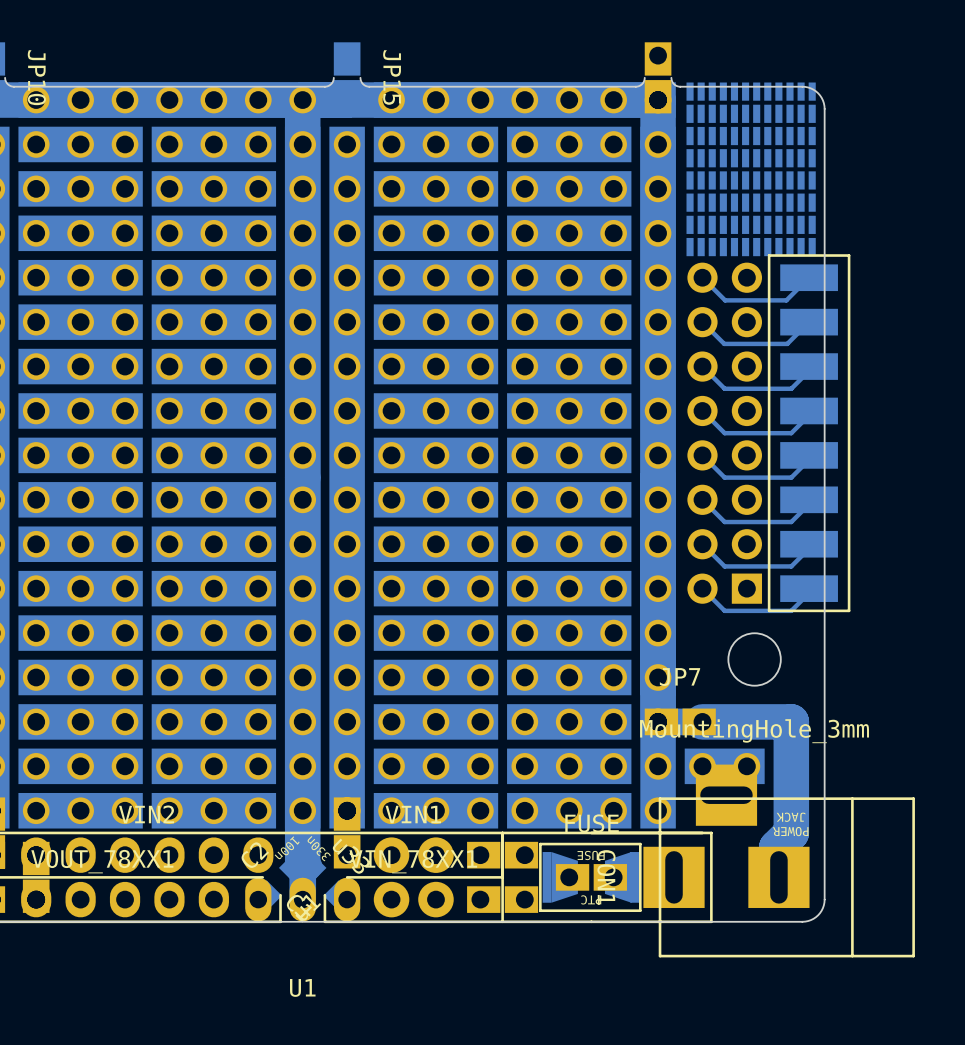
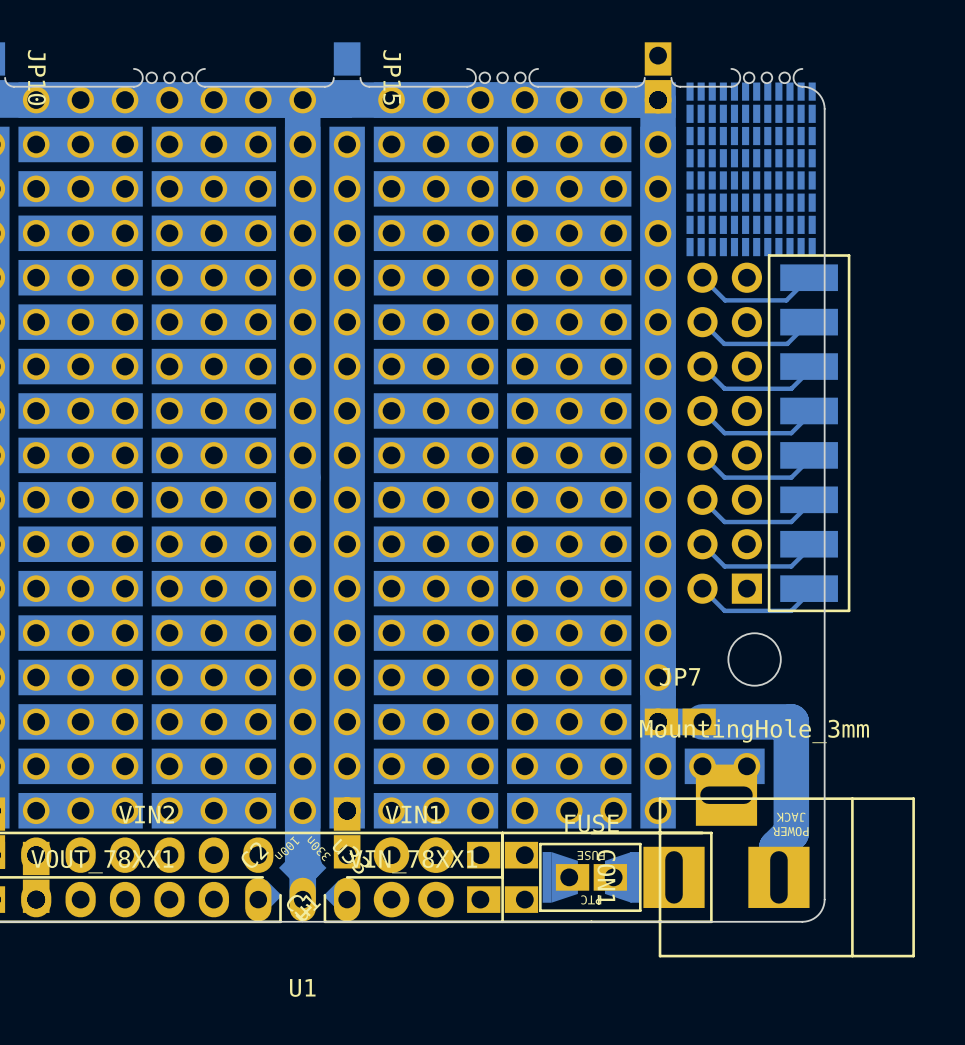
part: none -> (169, 77)
part: none -> (502, 77)
part: none -> (766, 77)
board edge: (204, 86) (133, 86) -> none
board edge: (538, 86) (467, 86) -> none
board edge: (802, 86) (731, 86) -> none

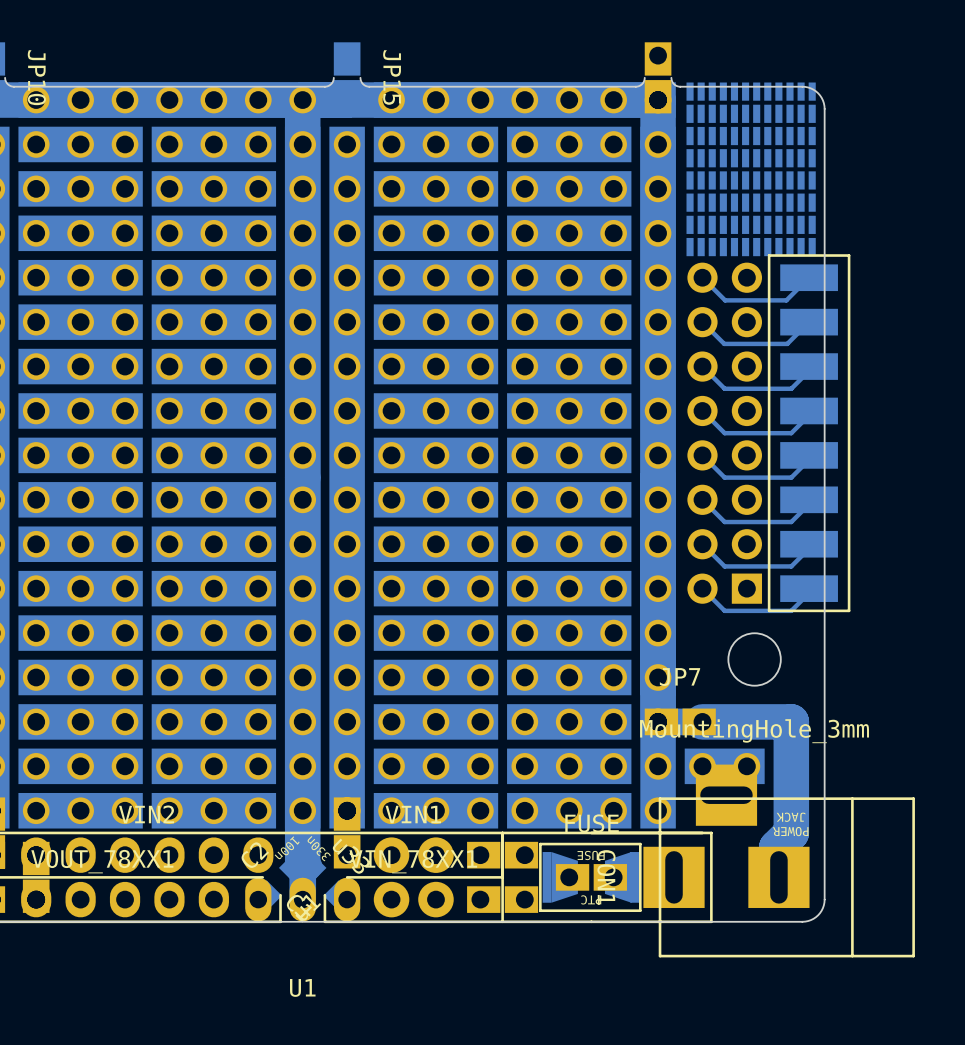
part: (169, 77) -> none
part: (502, 77) -> none
part: (766, 77) -> none
board edge: none -> (204, 86) (133, 86)
board edge: none -> (538, 86) (467, 86)
board edge: none -> (802, 86) (731, 86)

